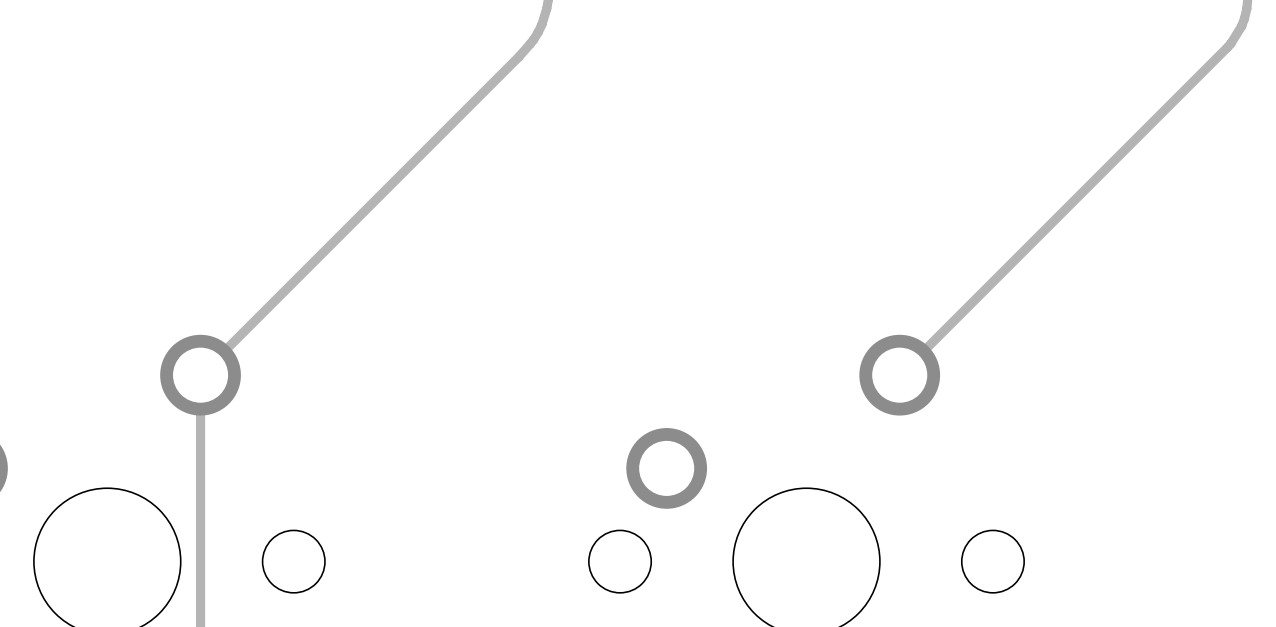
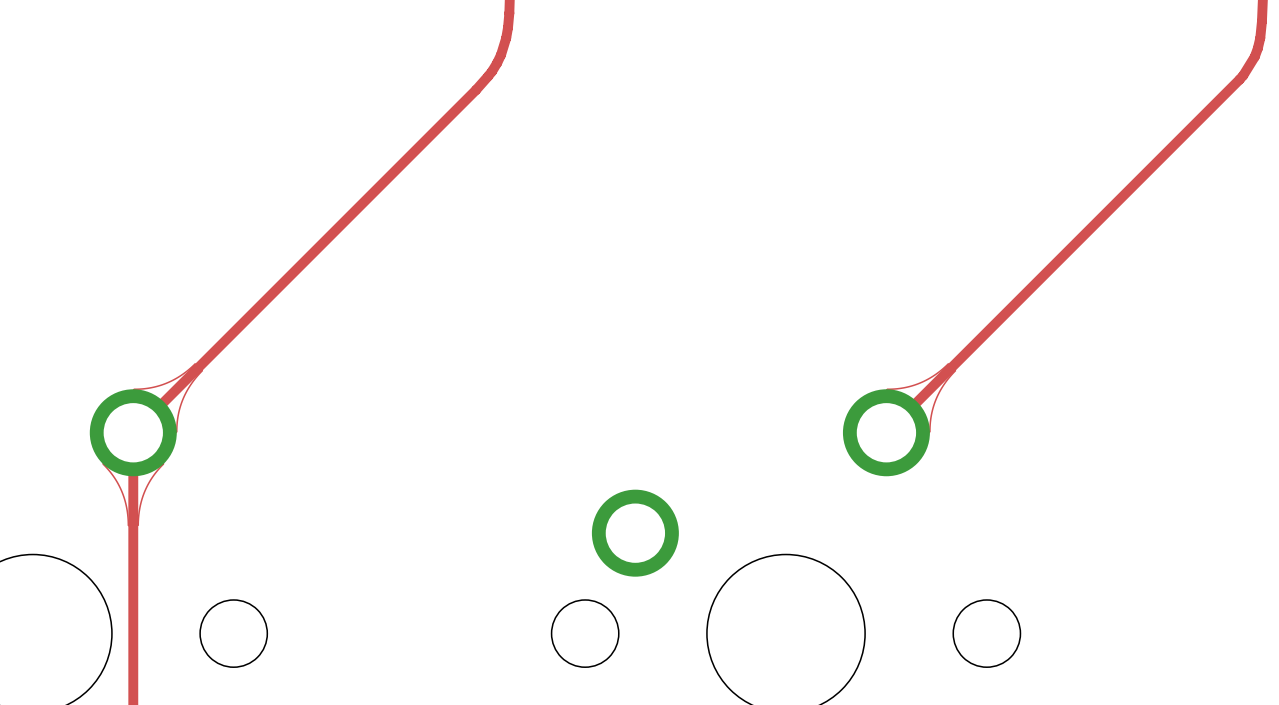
zone outline: none -> (195, 363) (181, 374) (167, 383) (150, 387) (133, 389) (117, 448) (176, 432) (178, 415) (183, 399) (191, 384) (202, 370) (195, 363)
zone outline: none -> (948, 363) (935, 374) (920, 383) (904, 387) (886, 389) (871, 448) (929, 432) (931, 415) (936, 399) (944, 384) (955, 370) (948, 363)
zone outline: none -> (133, 411) (163, 463) (152, 477) (144, 491) (139, 508) (138, 525) (128, 525) (126, 508) (121, 491) (114, 477) (102, 463) (133, 411)

